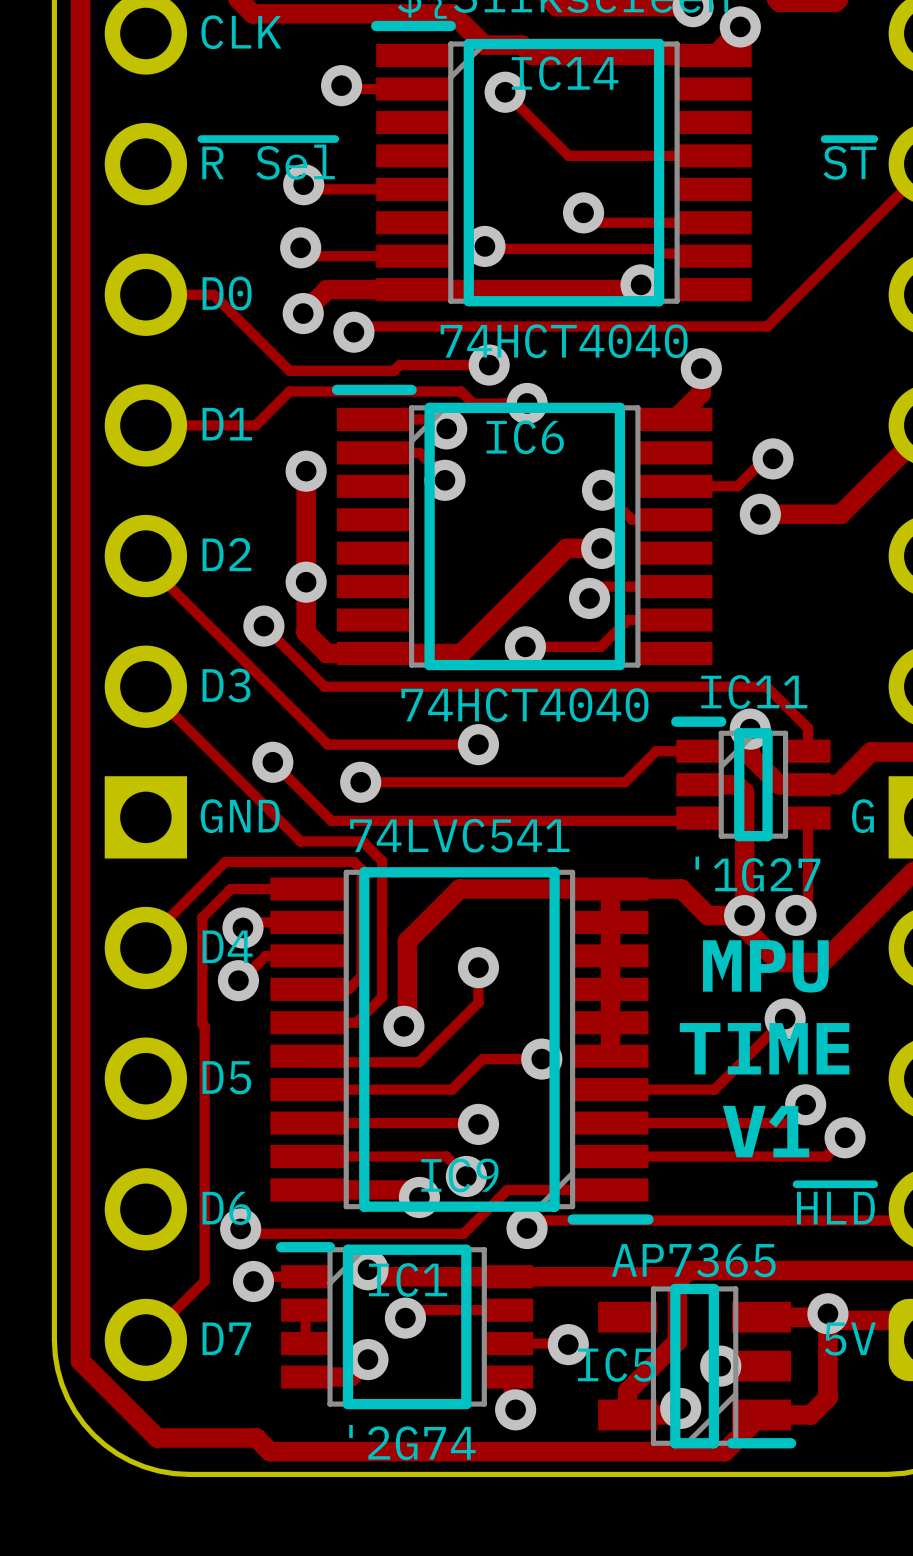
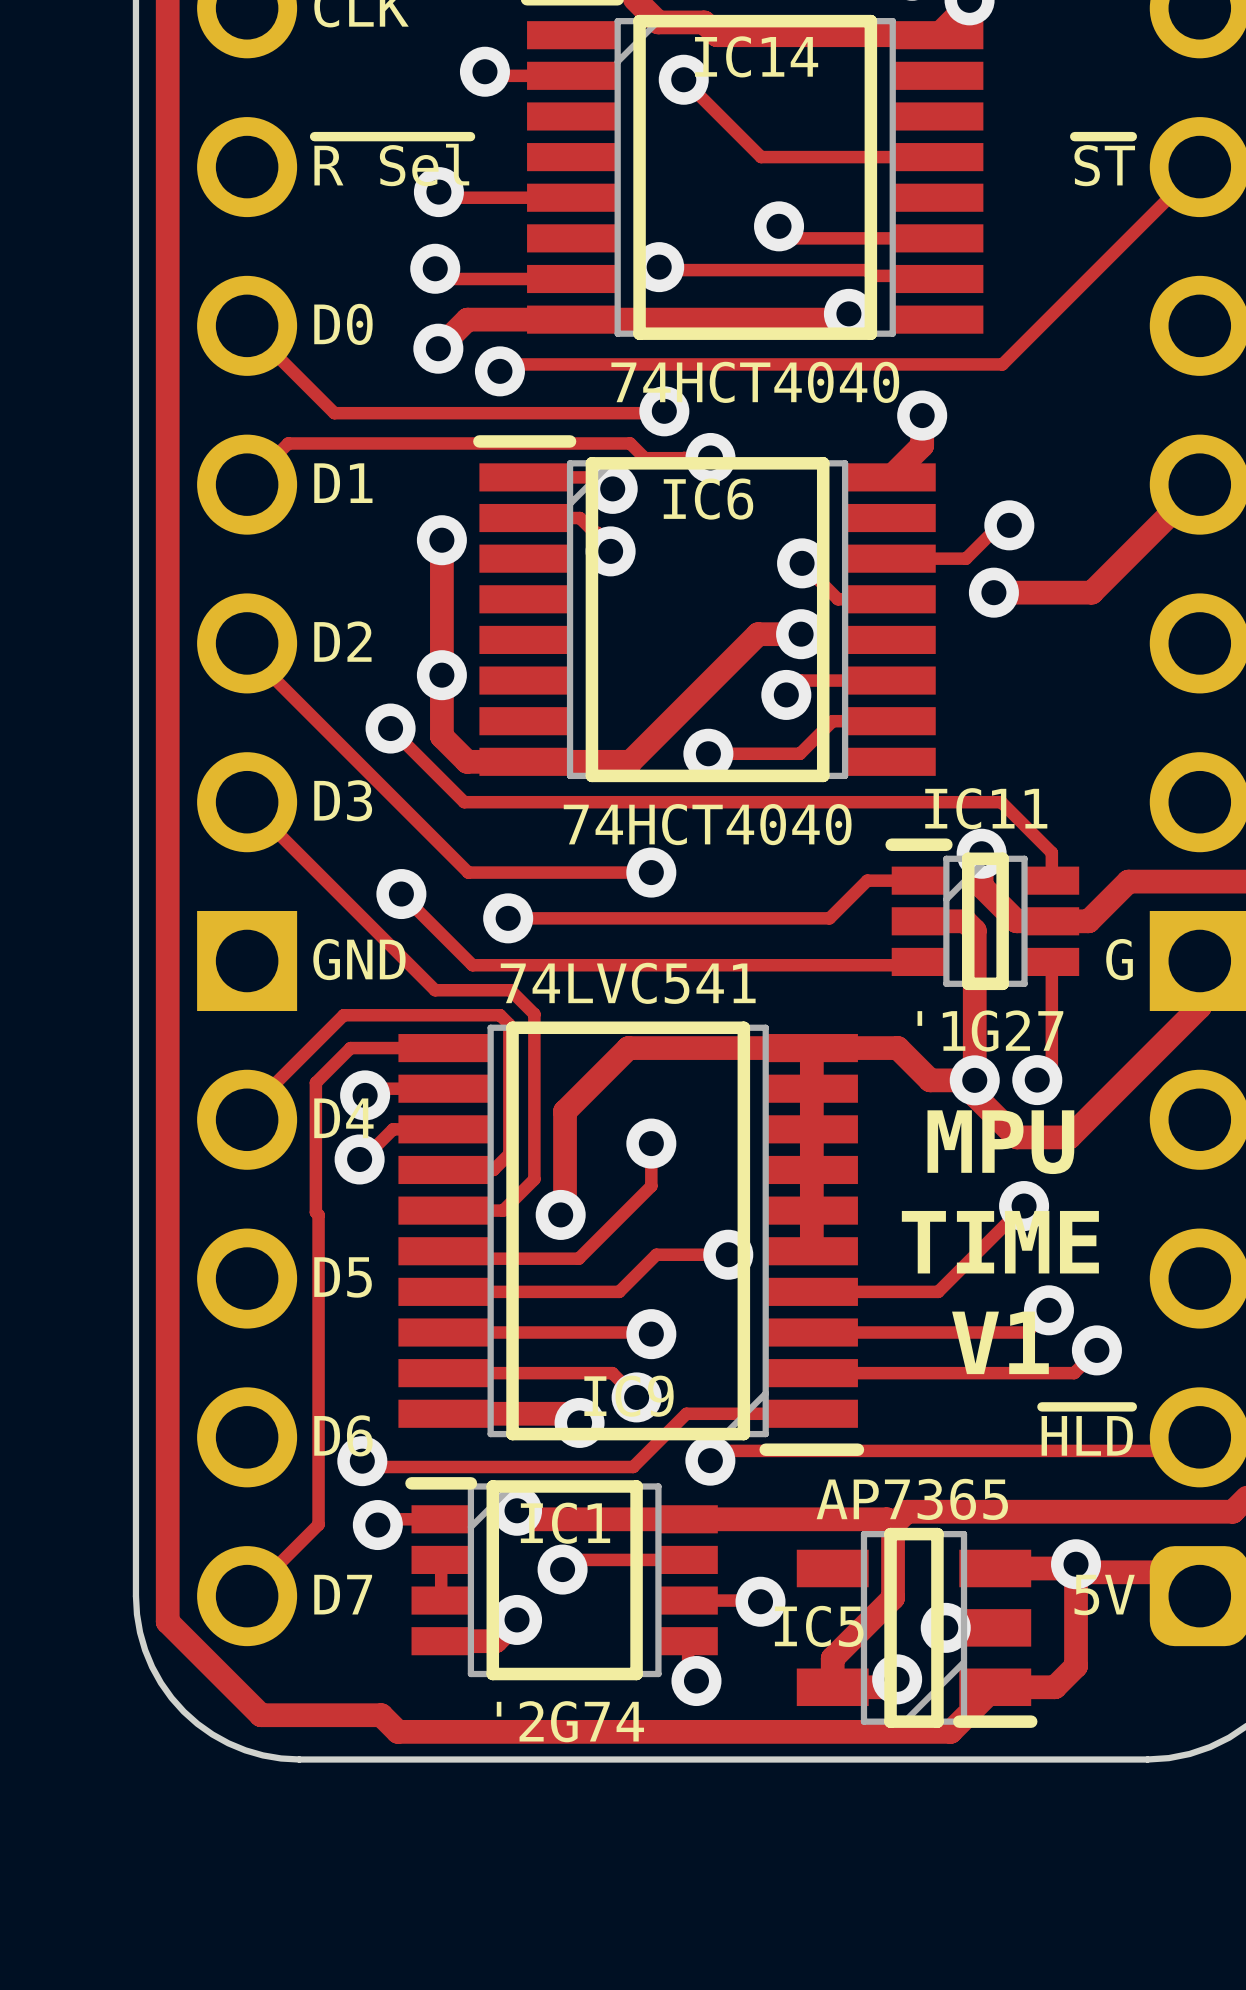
track: (145, 294) (213, 294) (289, 370) (394, 370) (399, 365) (489, 365) -> (247, 325) (334, 413) (662, 413) (664, 411)
track: (289, 391) (255, 425) (145, 425) -> (421, 443) (288, 443) (247, 484)

